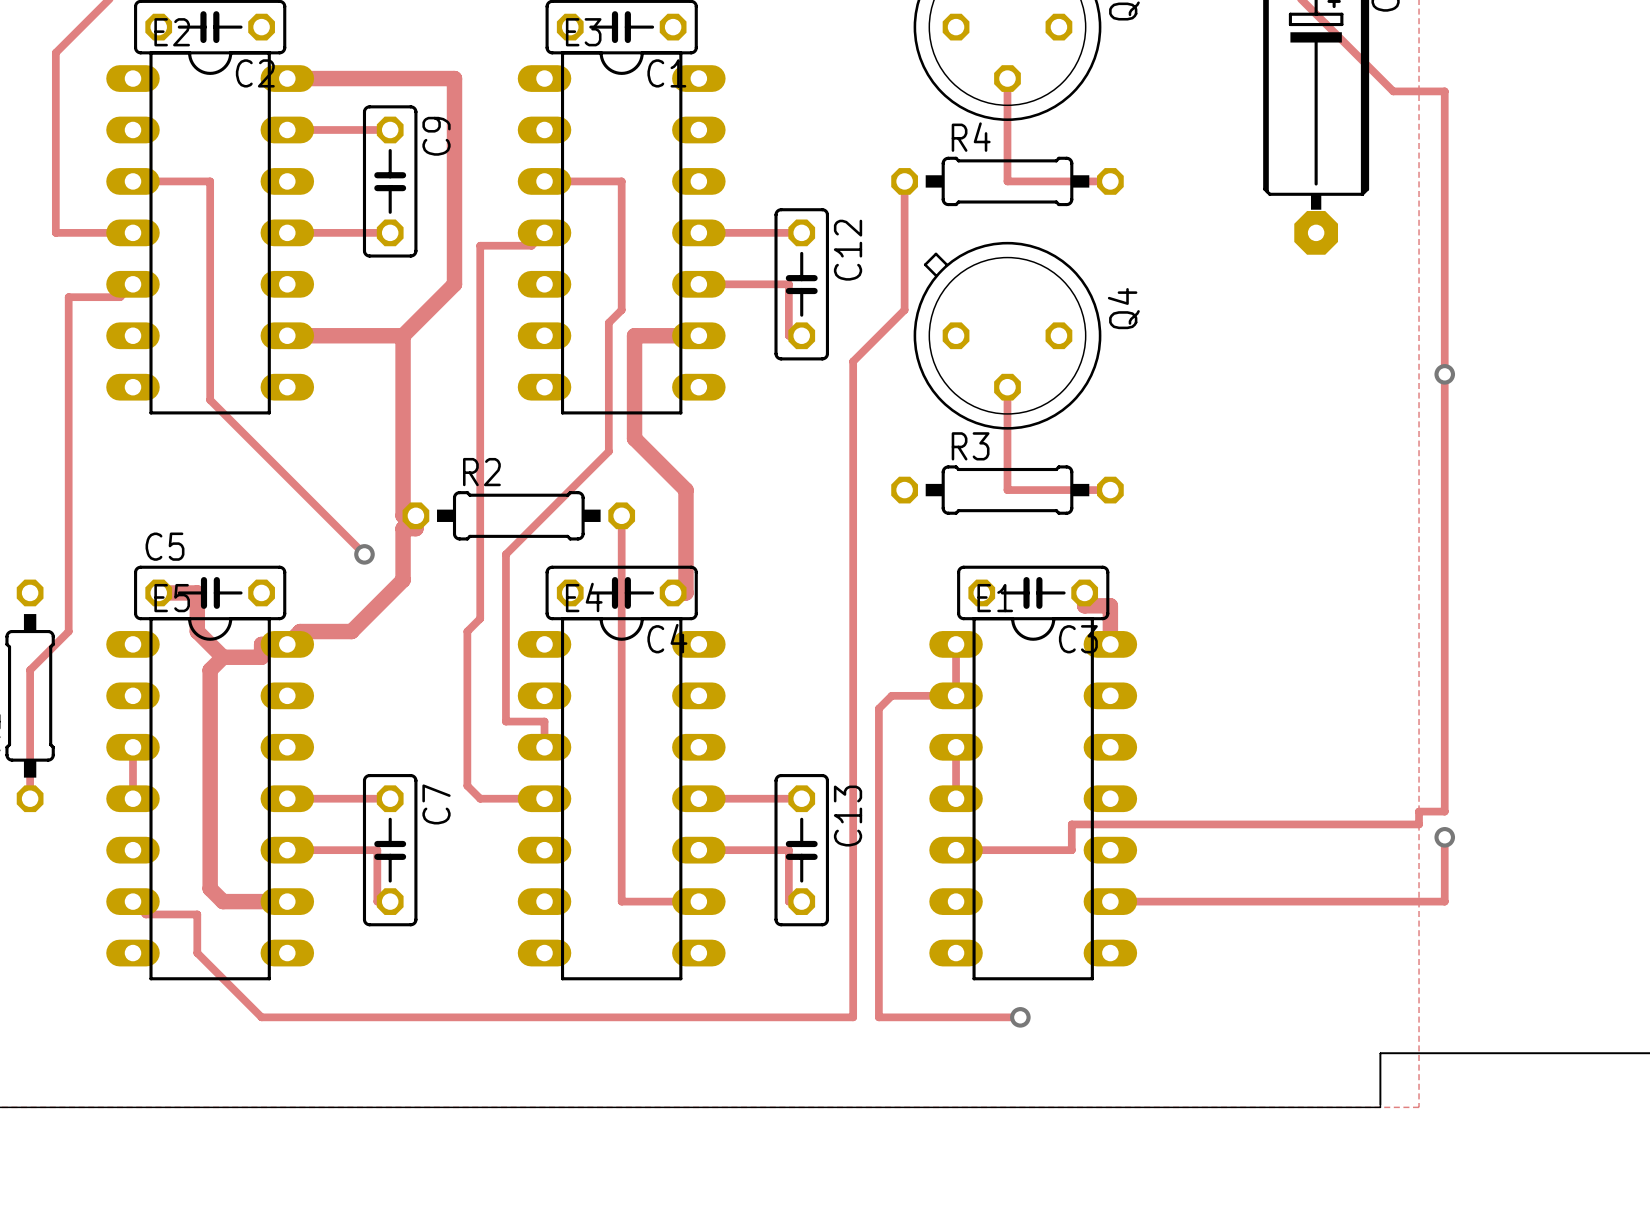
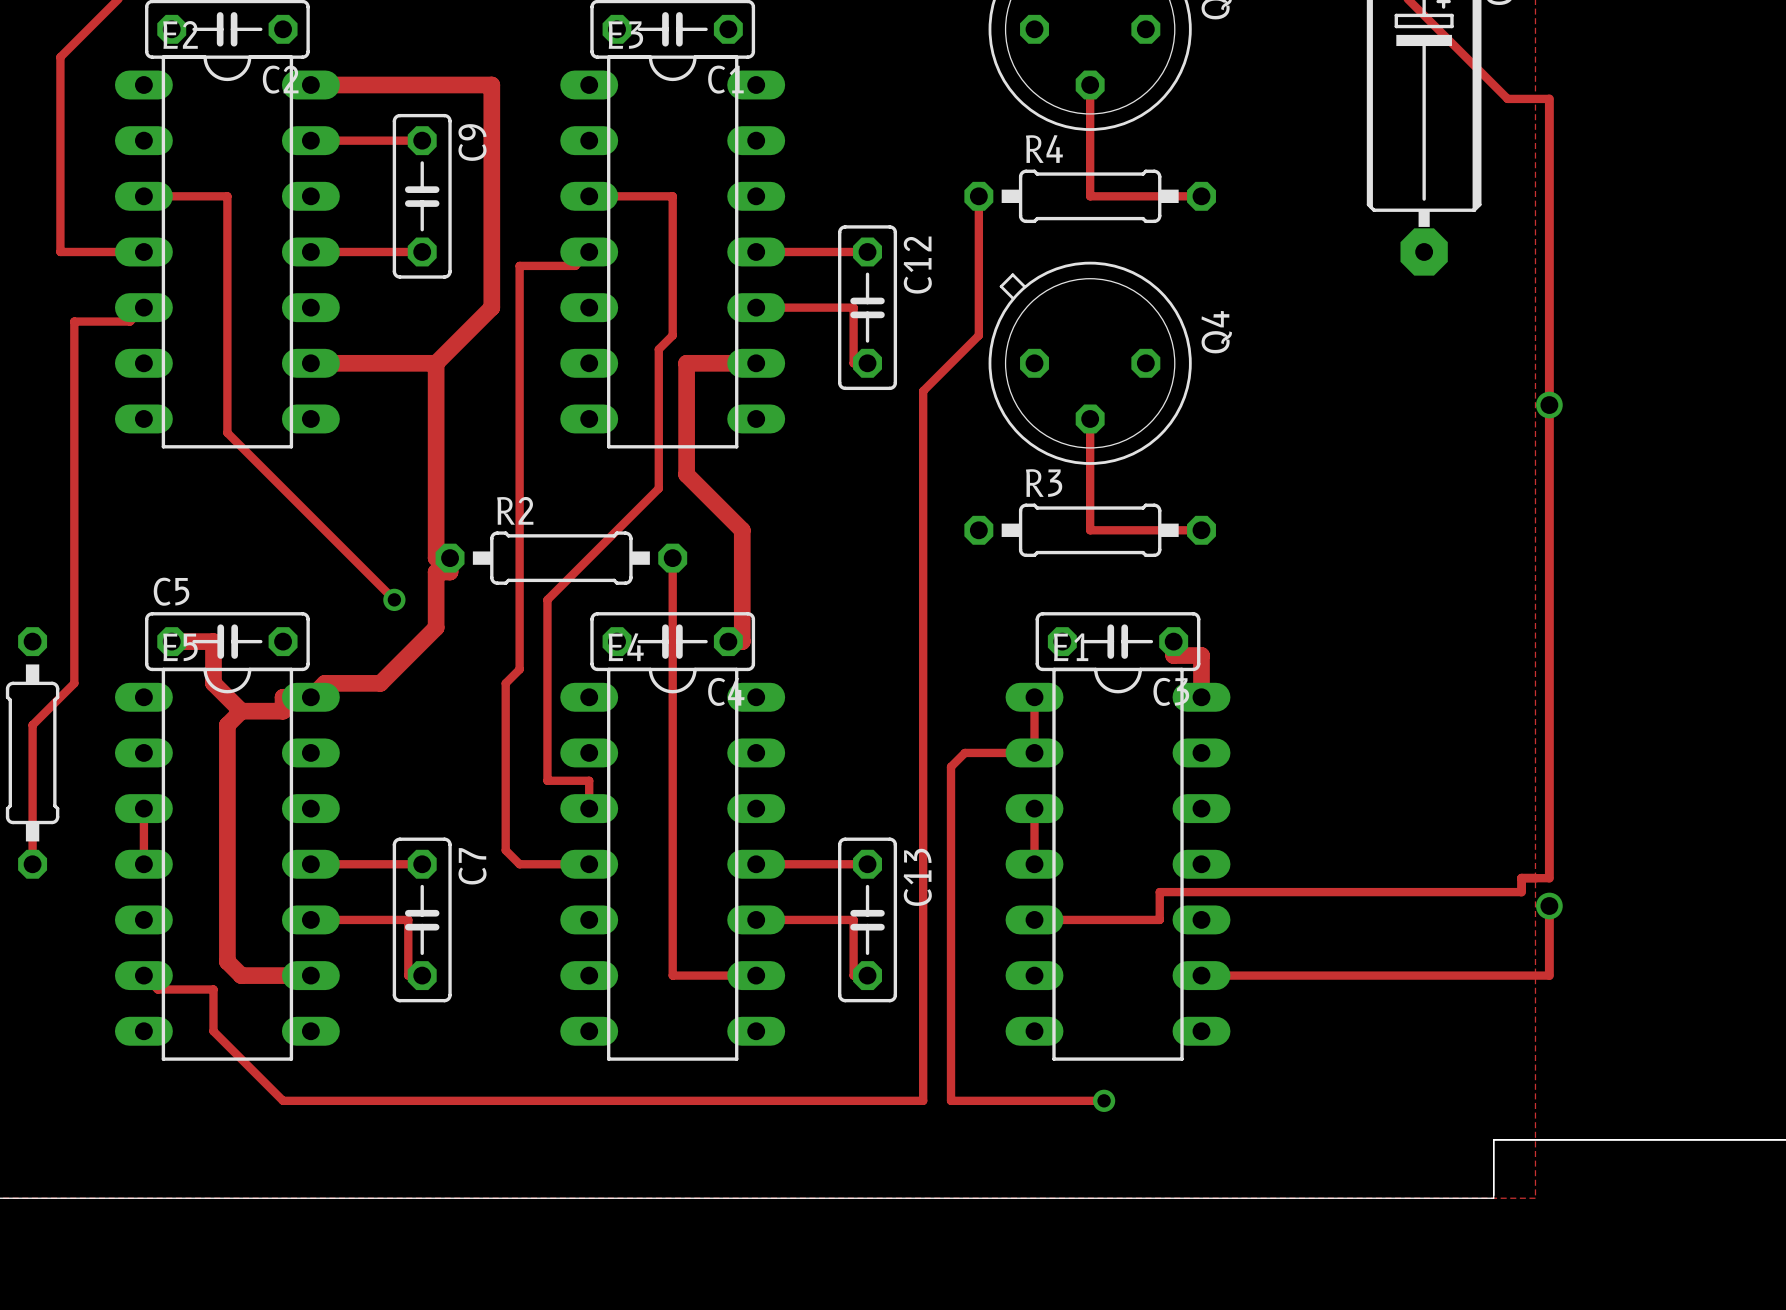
track: (1431, 91) (1444, 91) (1444, 811) (1431, 811) -> (1549, 98) (1549, 878)
via position: (1444, 374) -> (1549, 405)
track: (1419, 811) (1419, 824) (1406, 824) -> (1535, 878) (1521, 878) (1521, 892)
track: (1444, 837) (1444, 901) (1431, 901) -> (1549, 906) (1549, 975)
via position: (1444, 837) -> (1549, 906)

